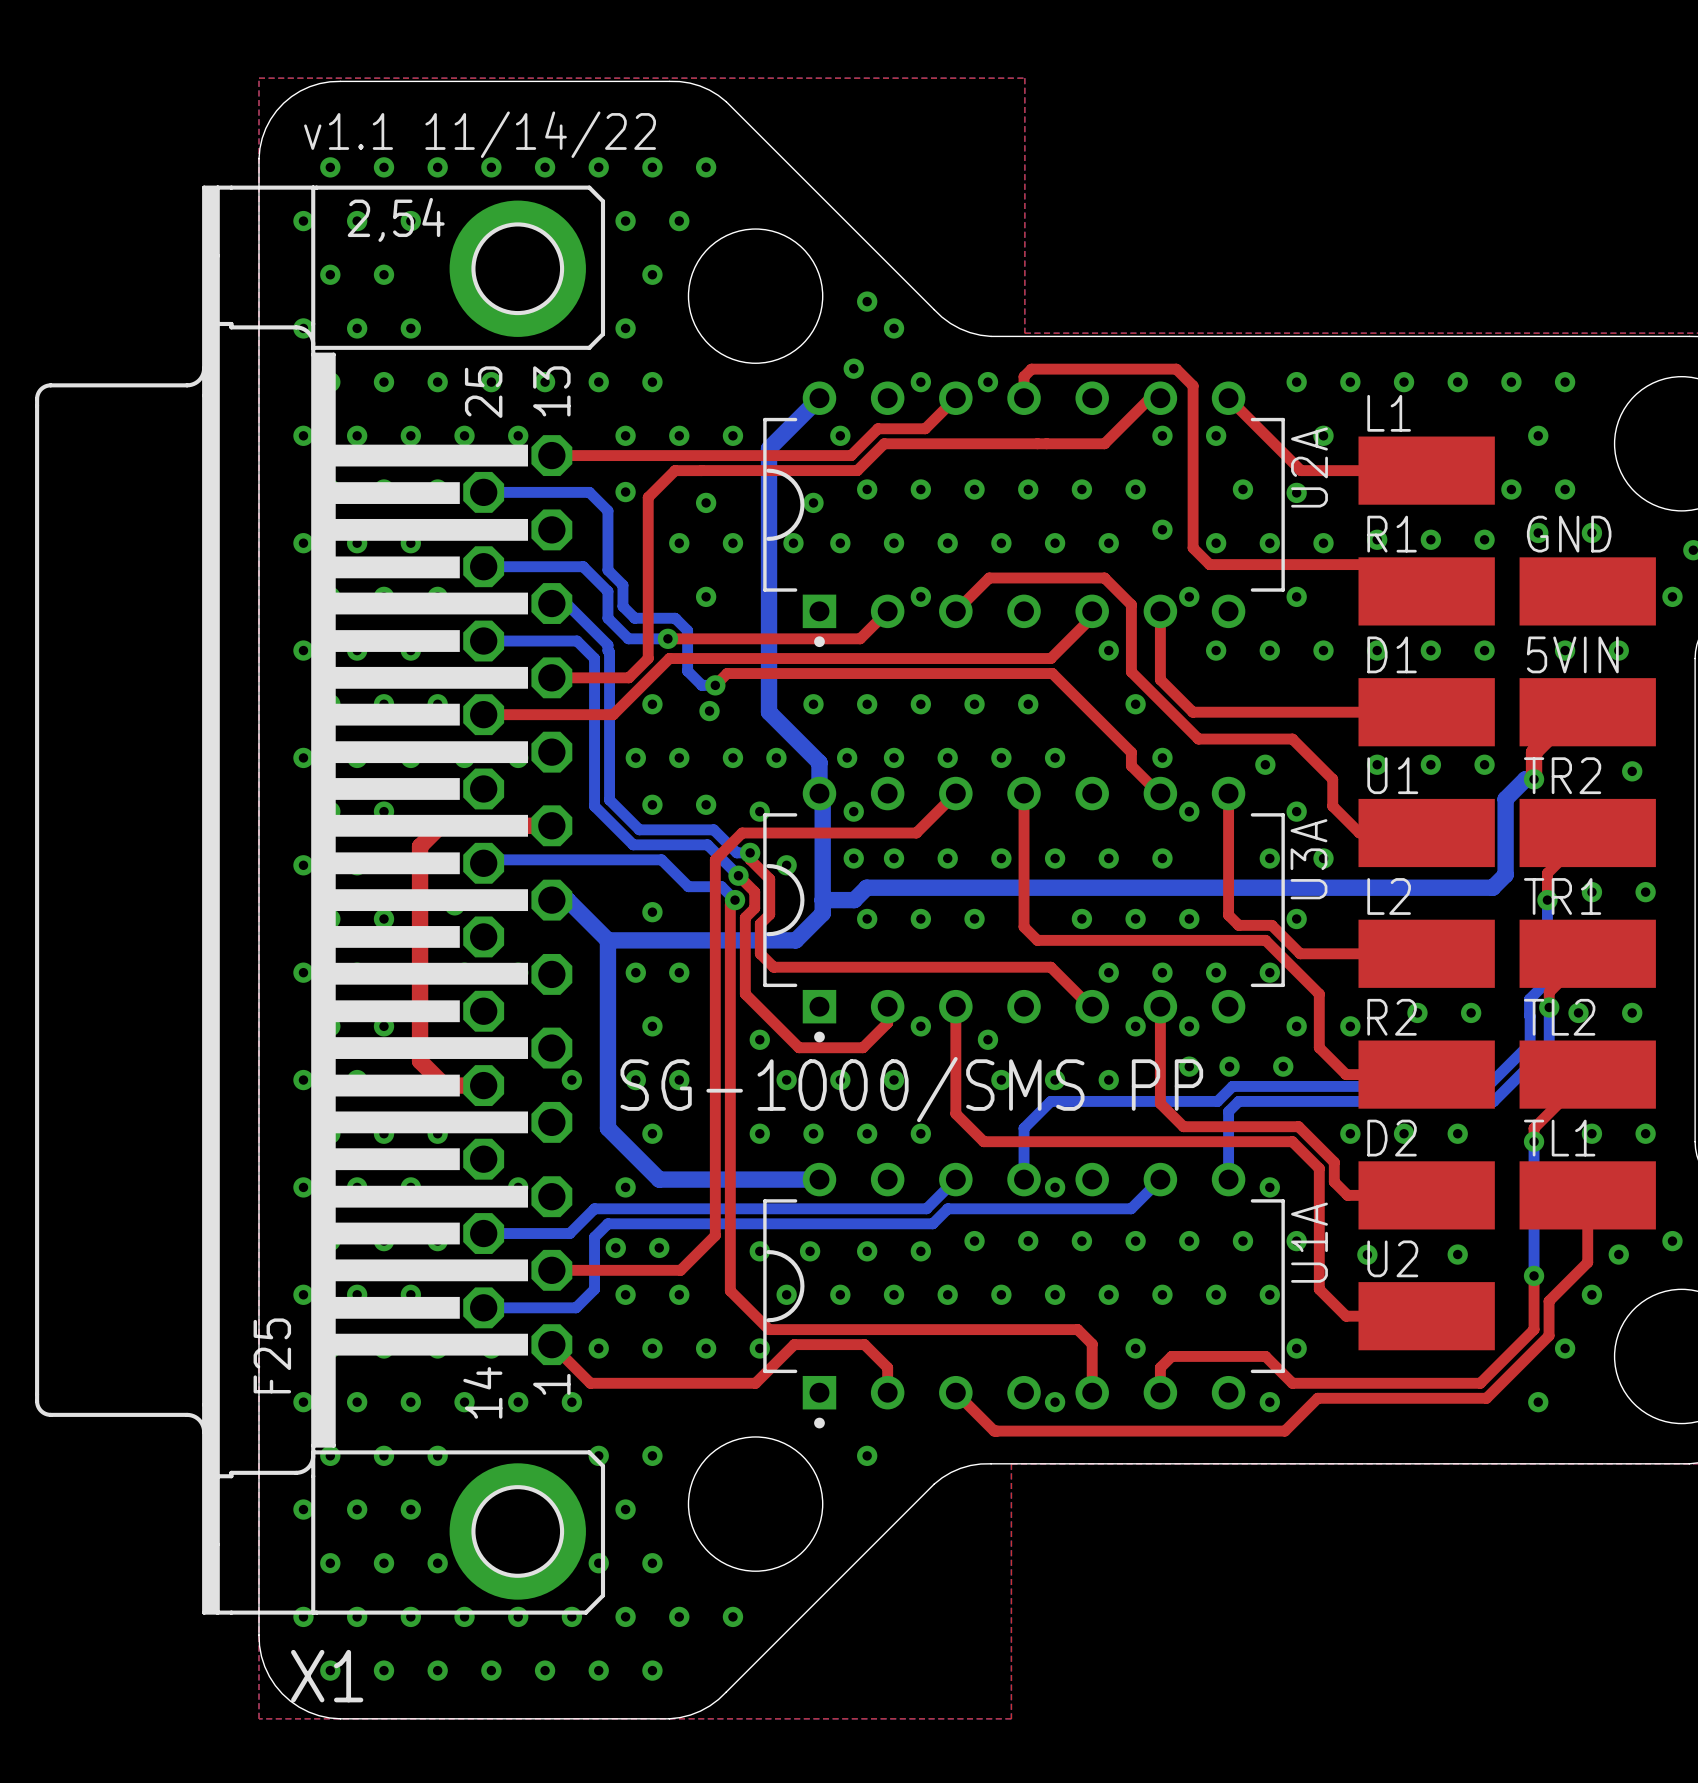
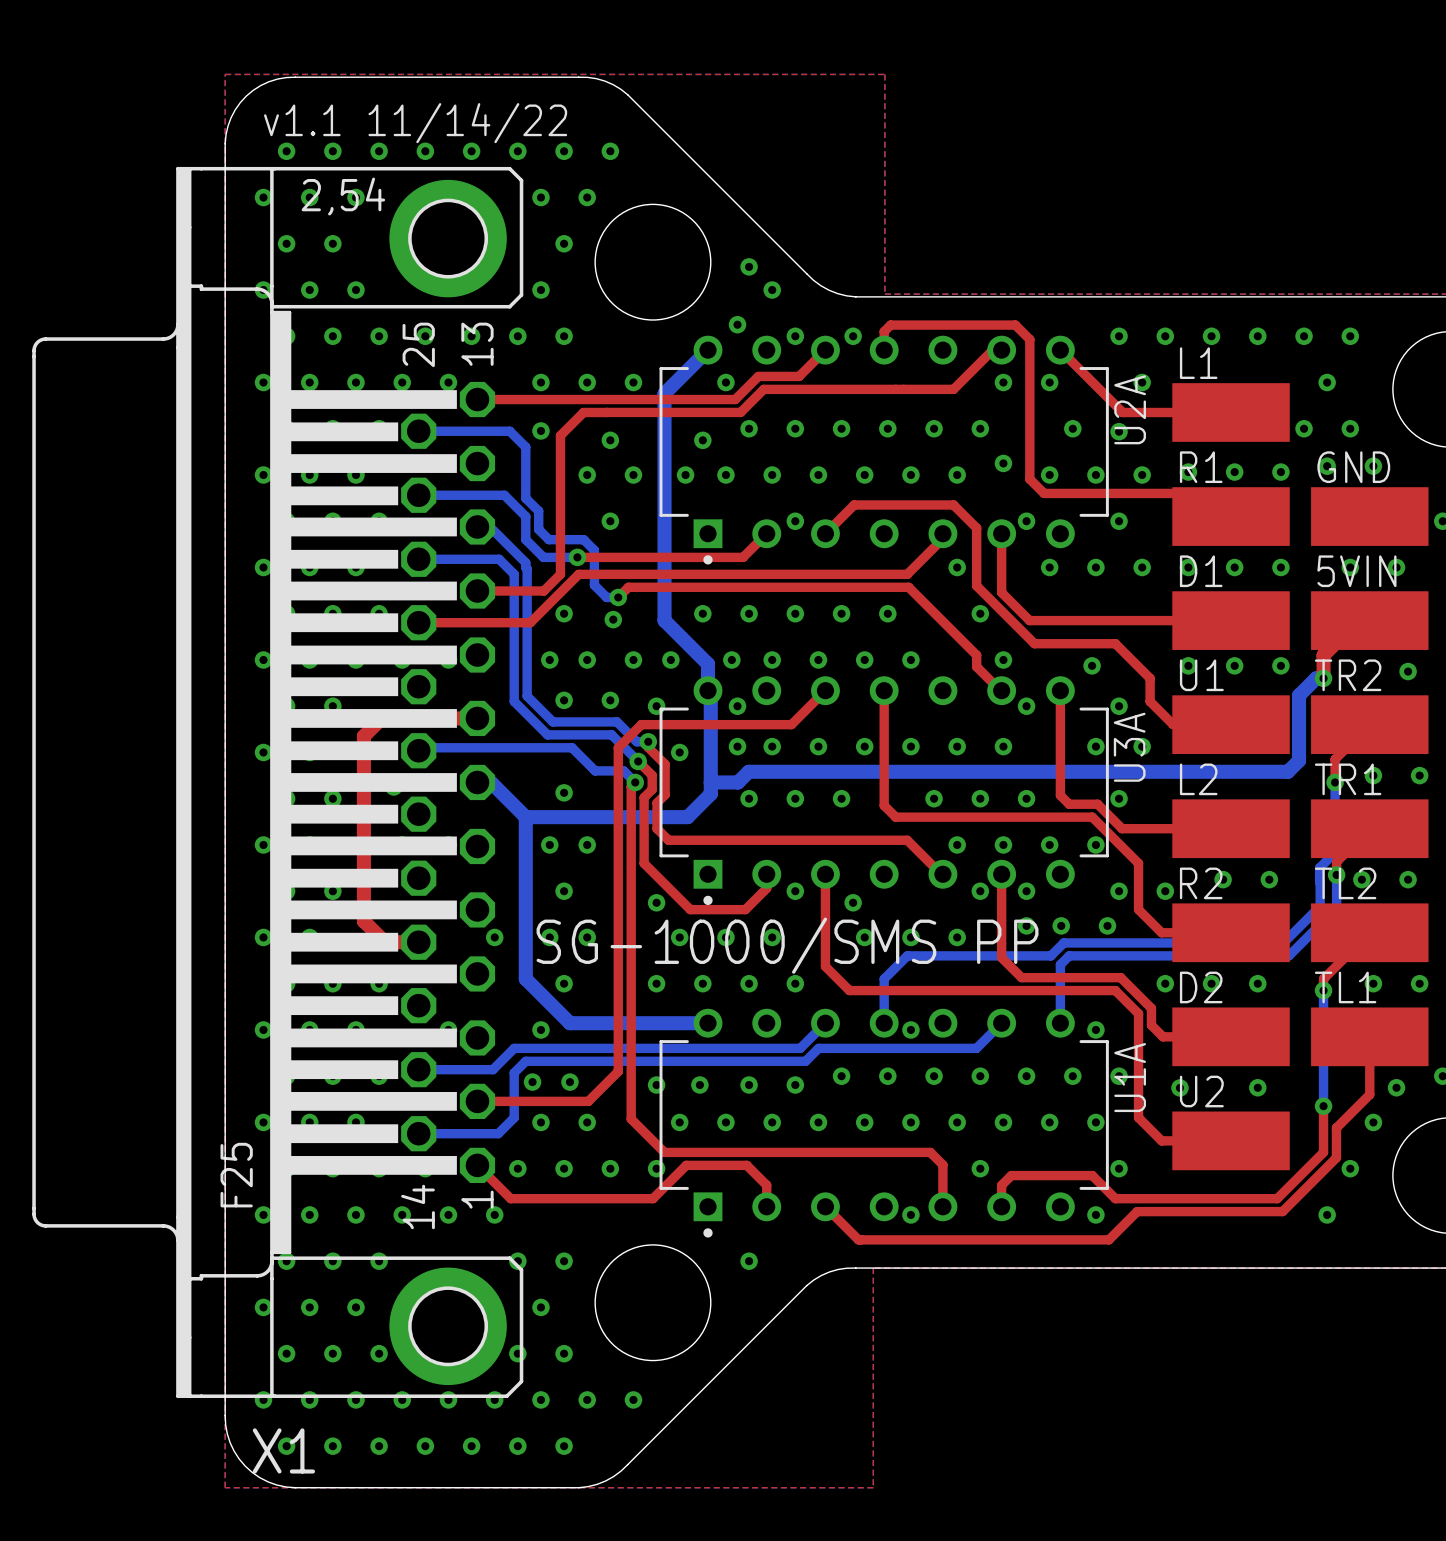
U2A footprint: [763, 381, 1285, 648] -> [659, 335, 1109, 565]
U3A footprint: [763, 776, 1285, 1043] -> [659, 676, 1109, 906]
U1A footprint: [763, 1162, 1285, 1429] -> [659, 1008, 1109, 1238]

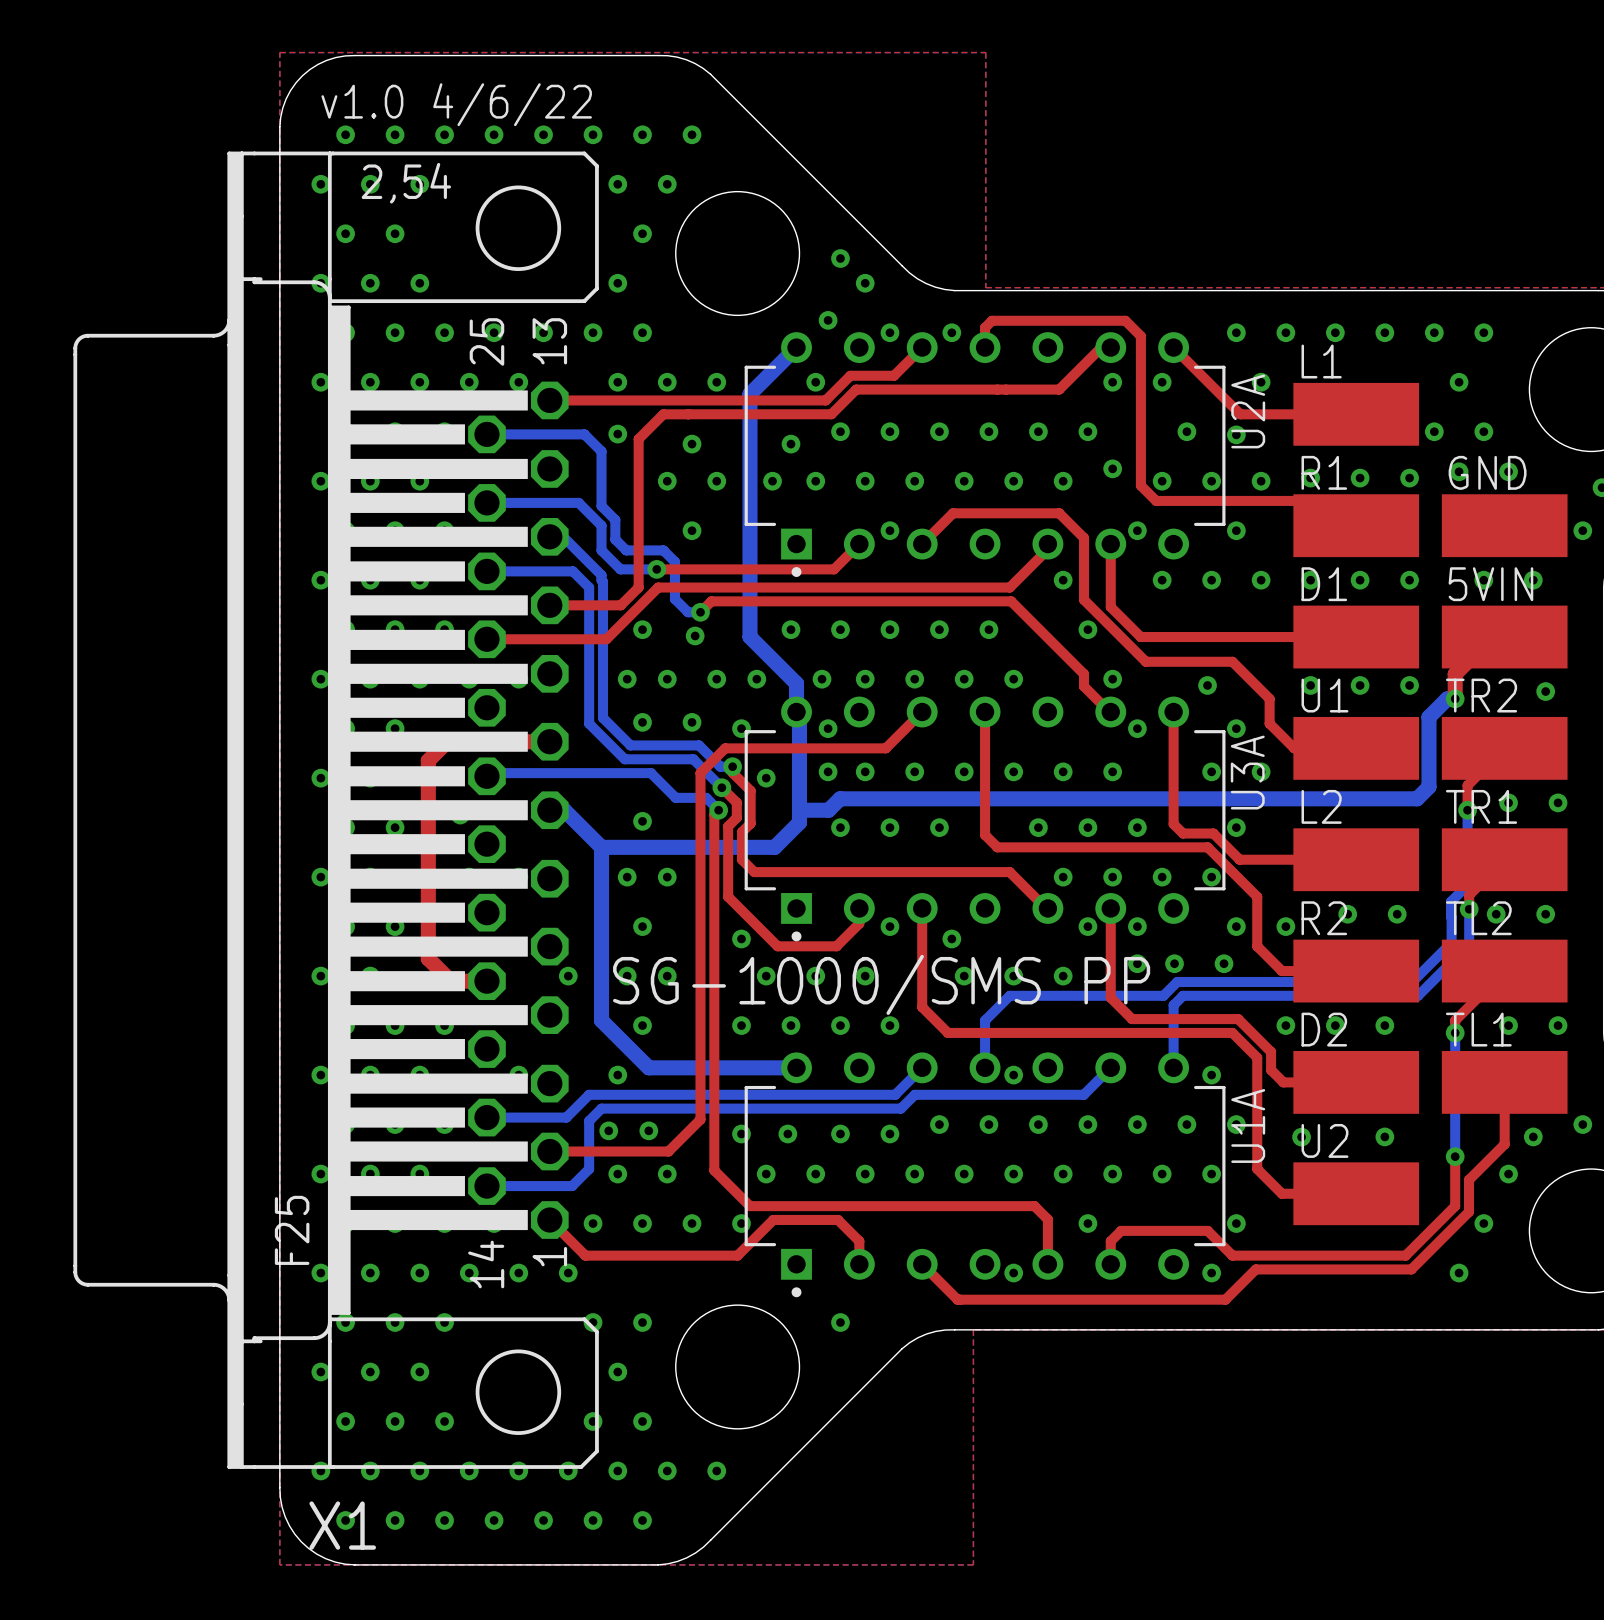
text: v1.1 11/14/22 (415, 123) -> v1.0 4/6/22 (456, 104)
X1 footprint: [32, 166, 524, 1398] -> [73, 151, 599, 1469]

